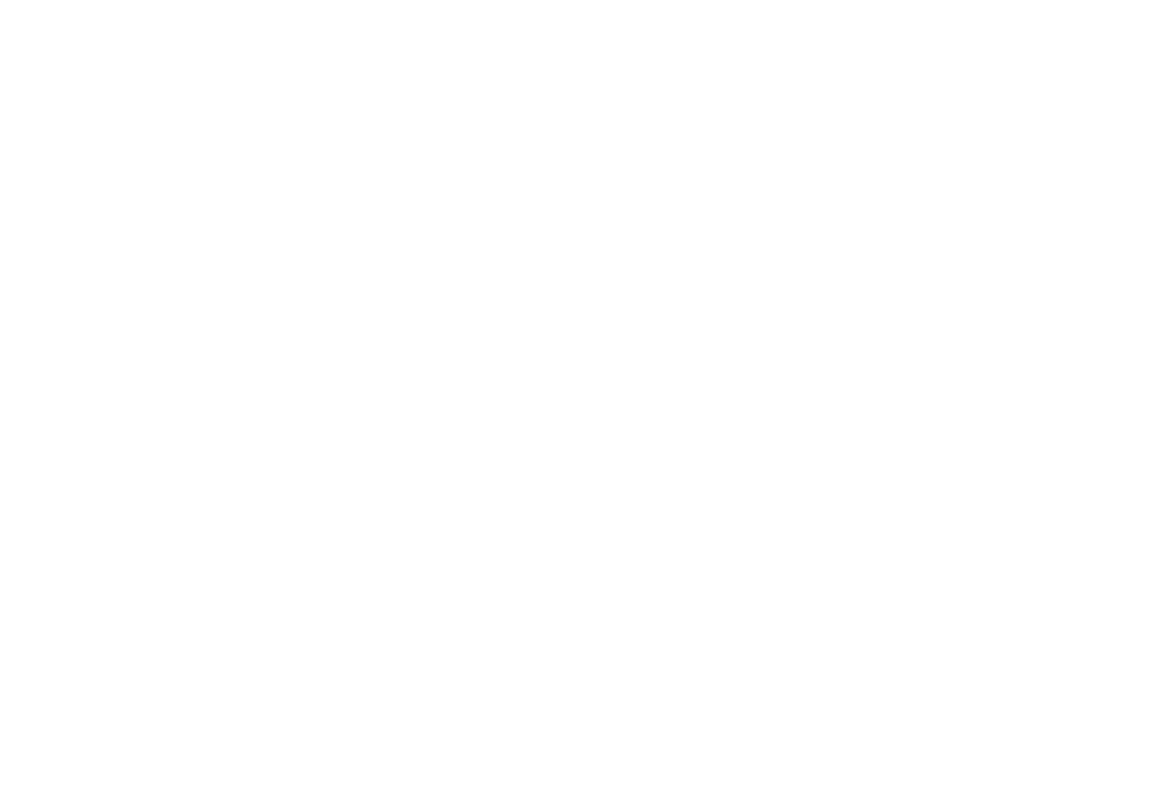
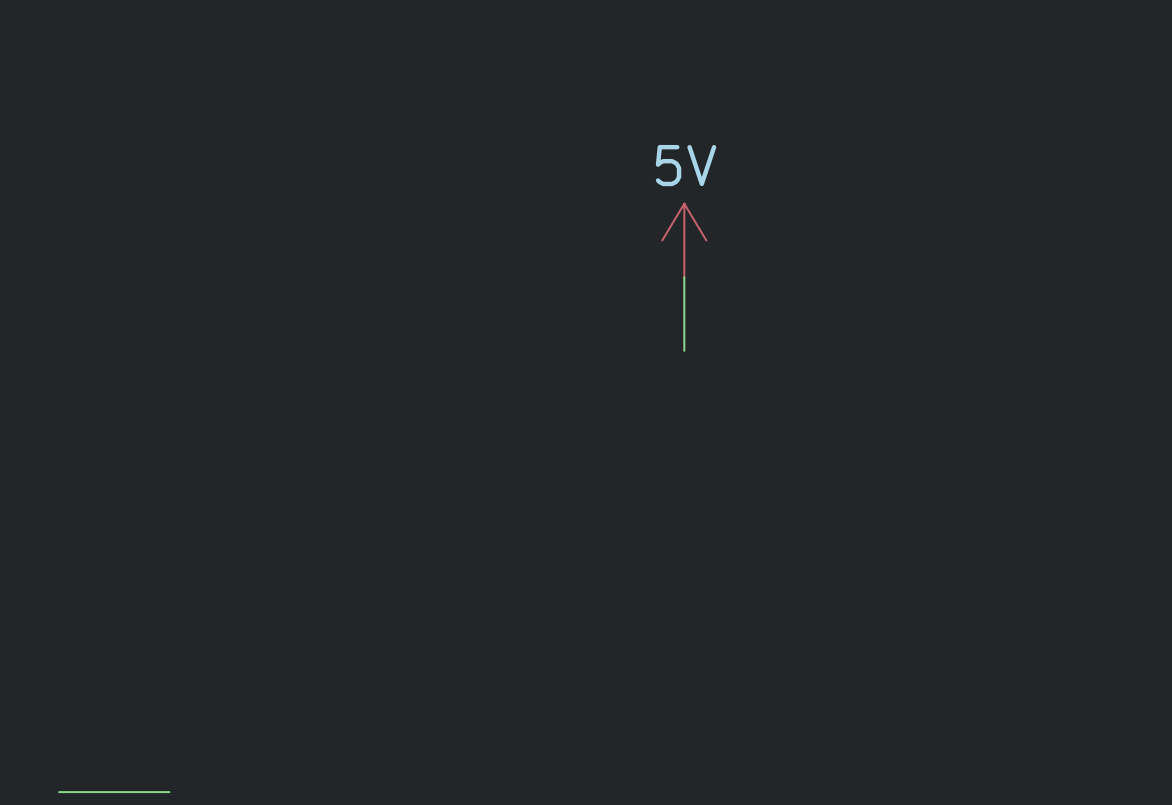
power symbol: none -> 5V (684, 240)
wire: none -> (684, 277) (684, 350)
wire: none -> (59, 792) (169, 792)

